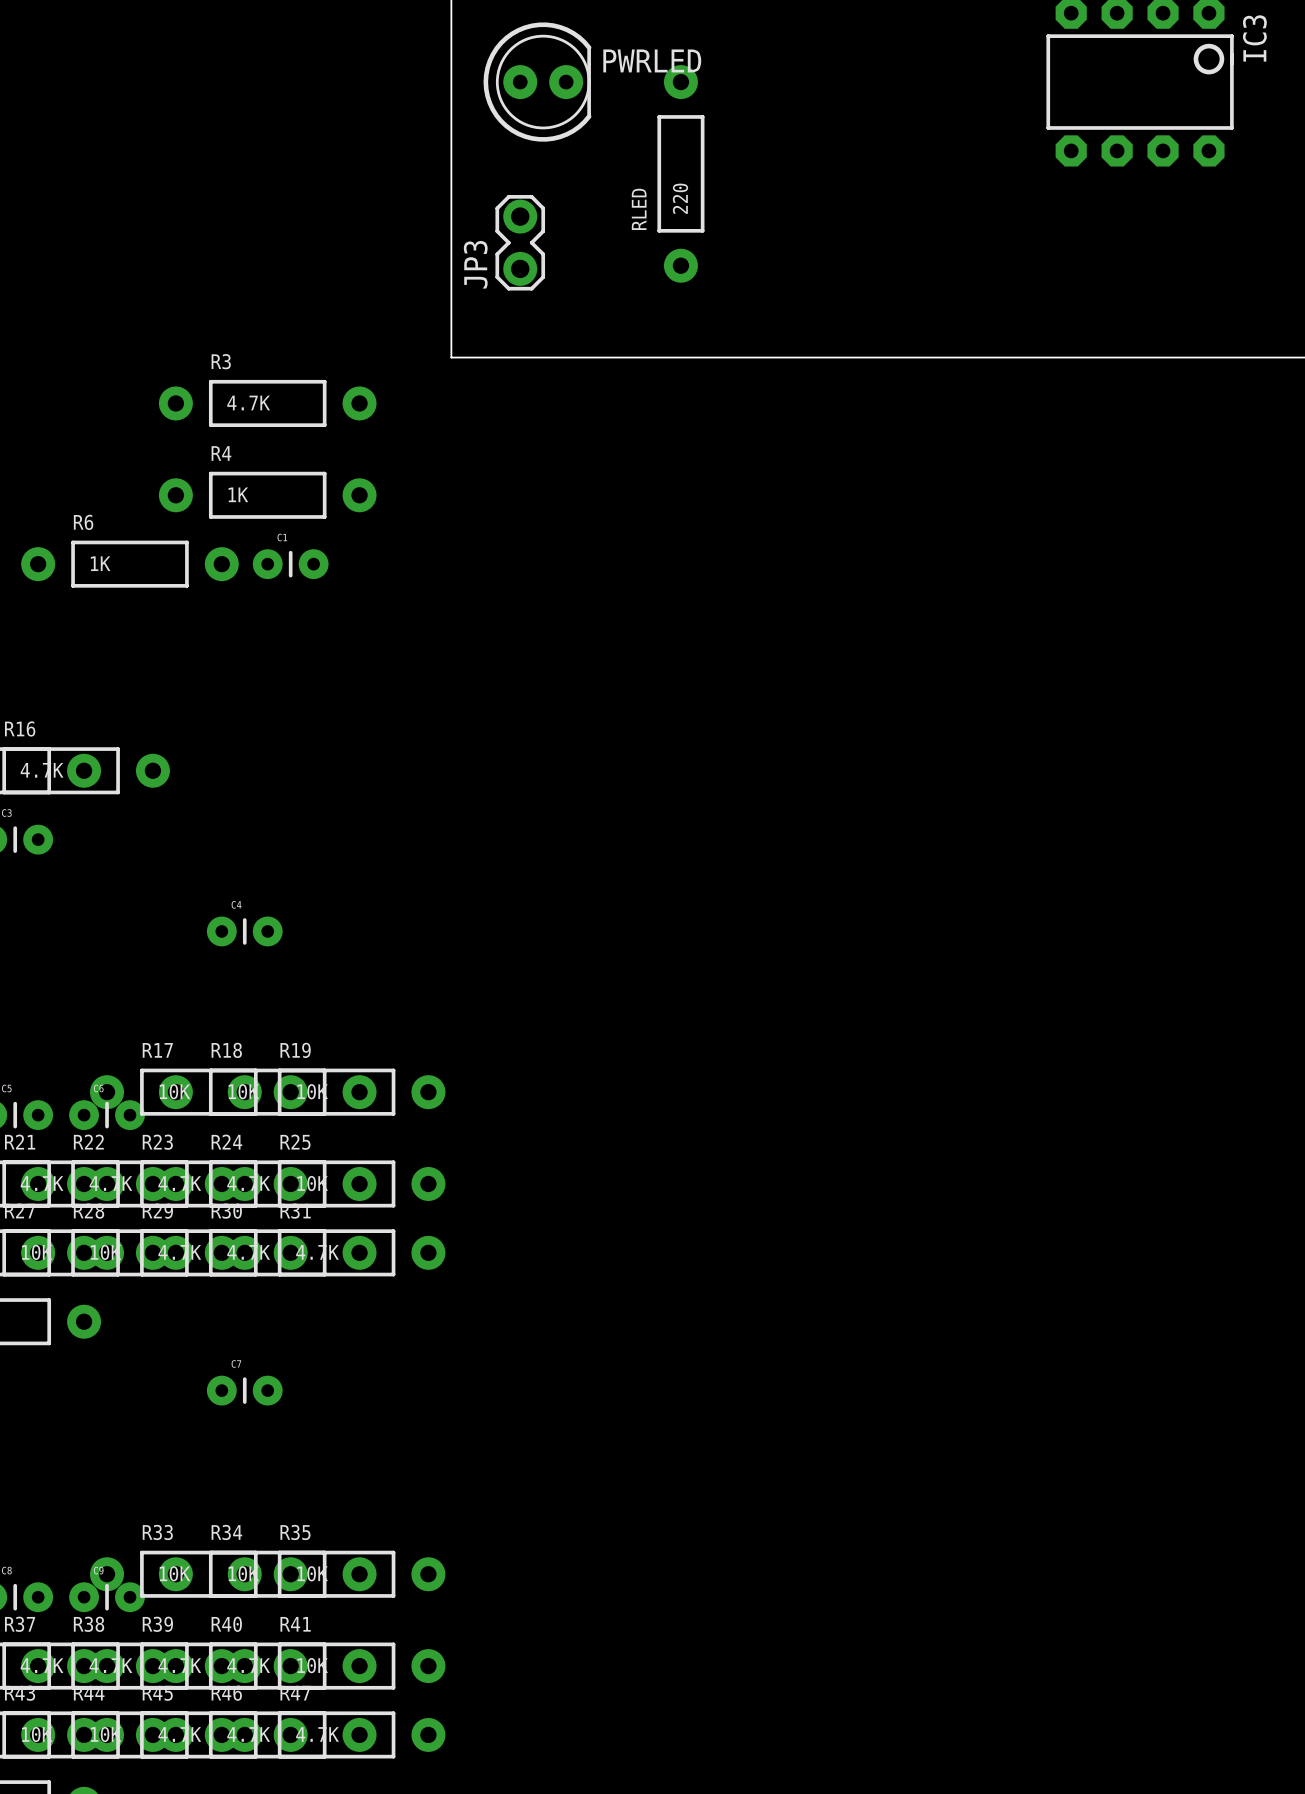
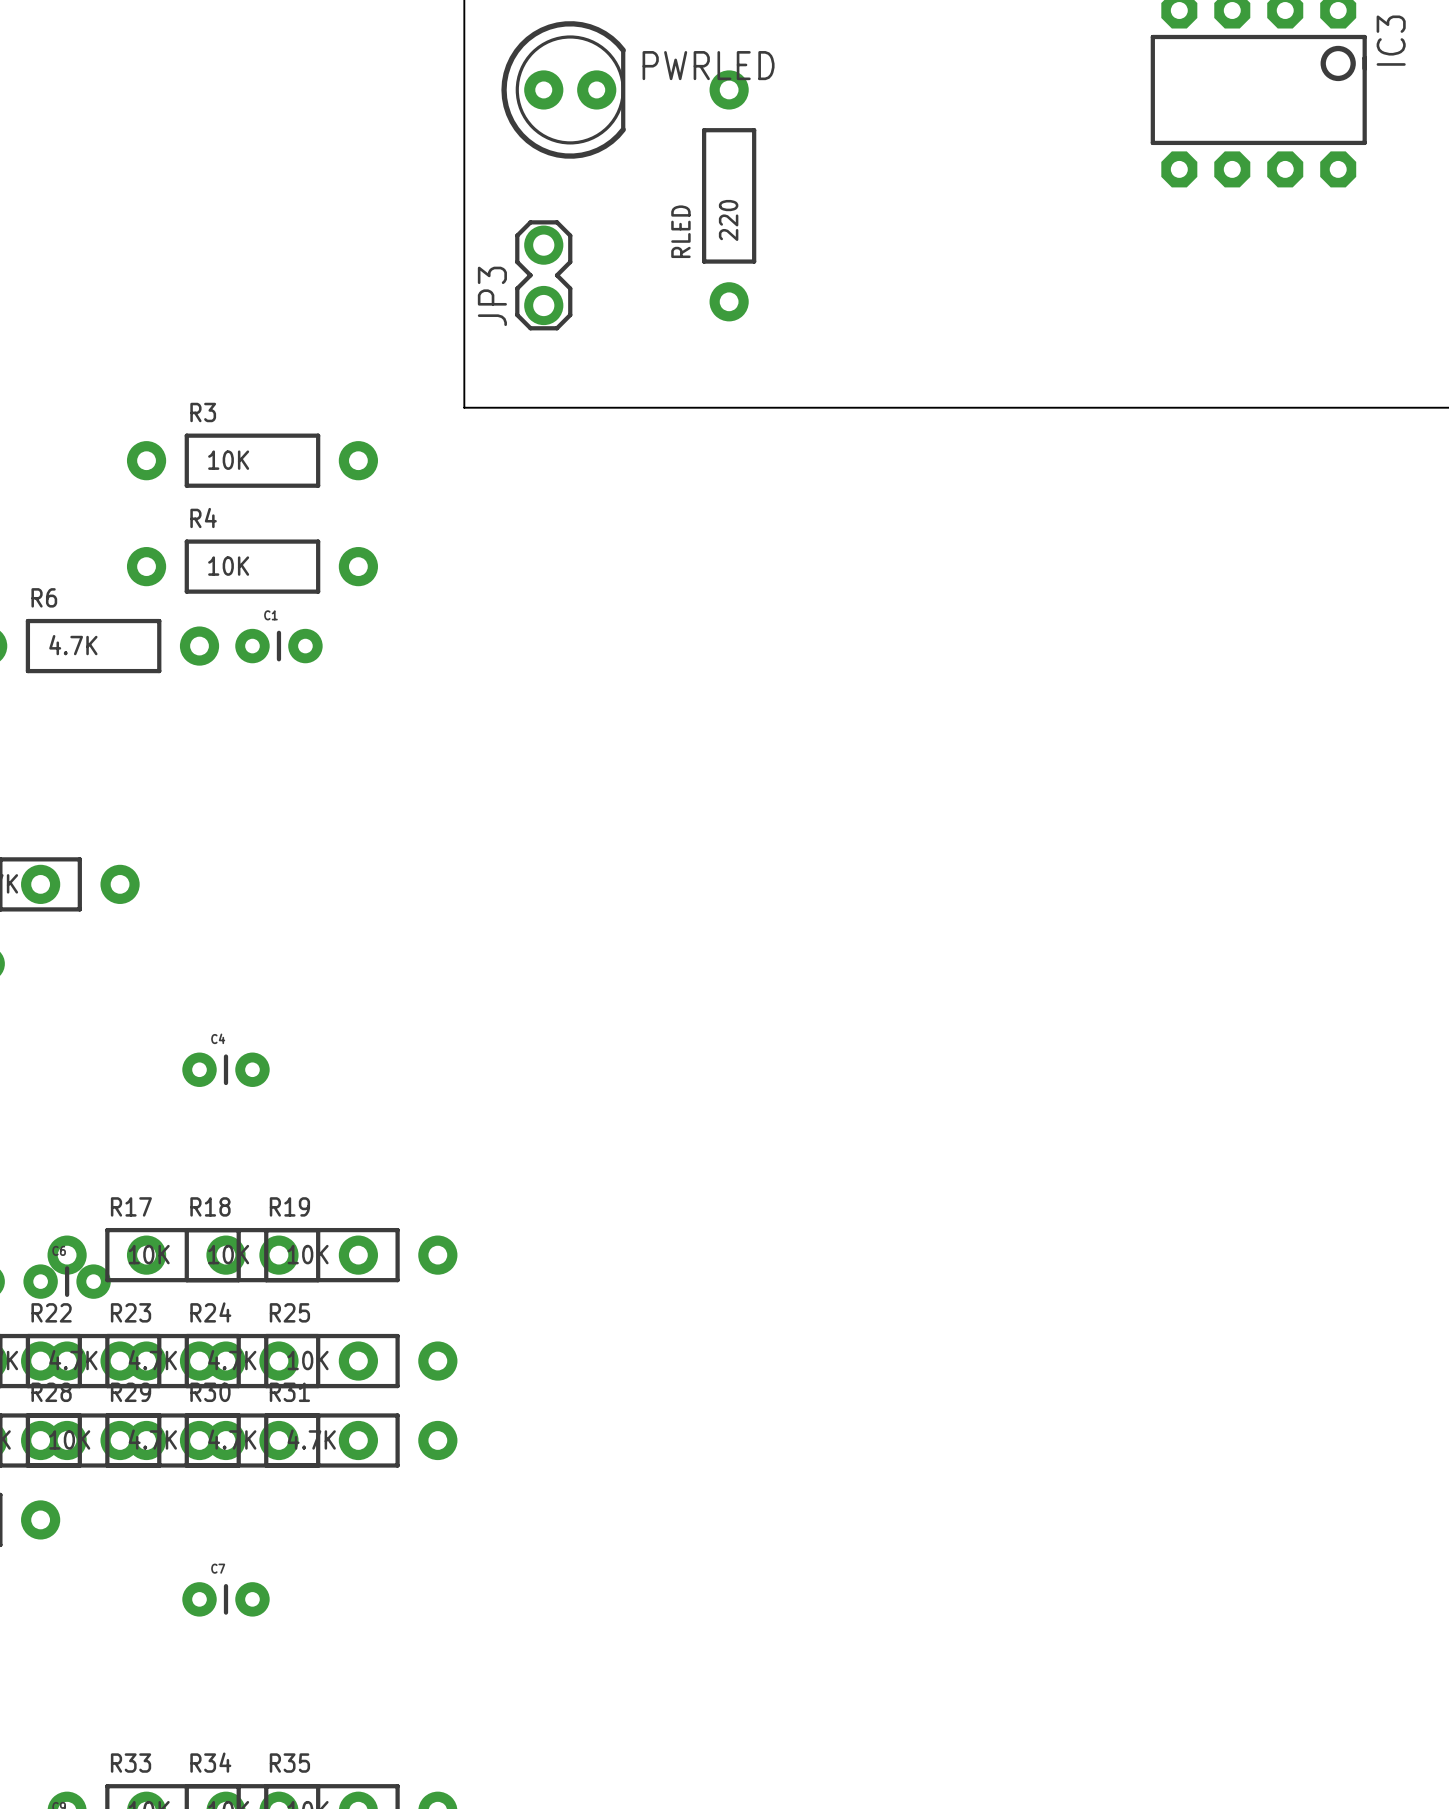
R3 value: 4.7K (248, 402) -> 10K (228, 460)
R4 value: 1K (238, 494) -> 10K (228, 566)
R6 value: 1K (100, 563) -> 4.7K (73, 645)

